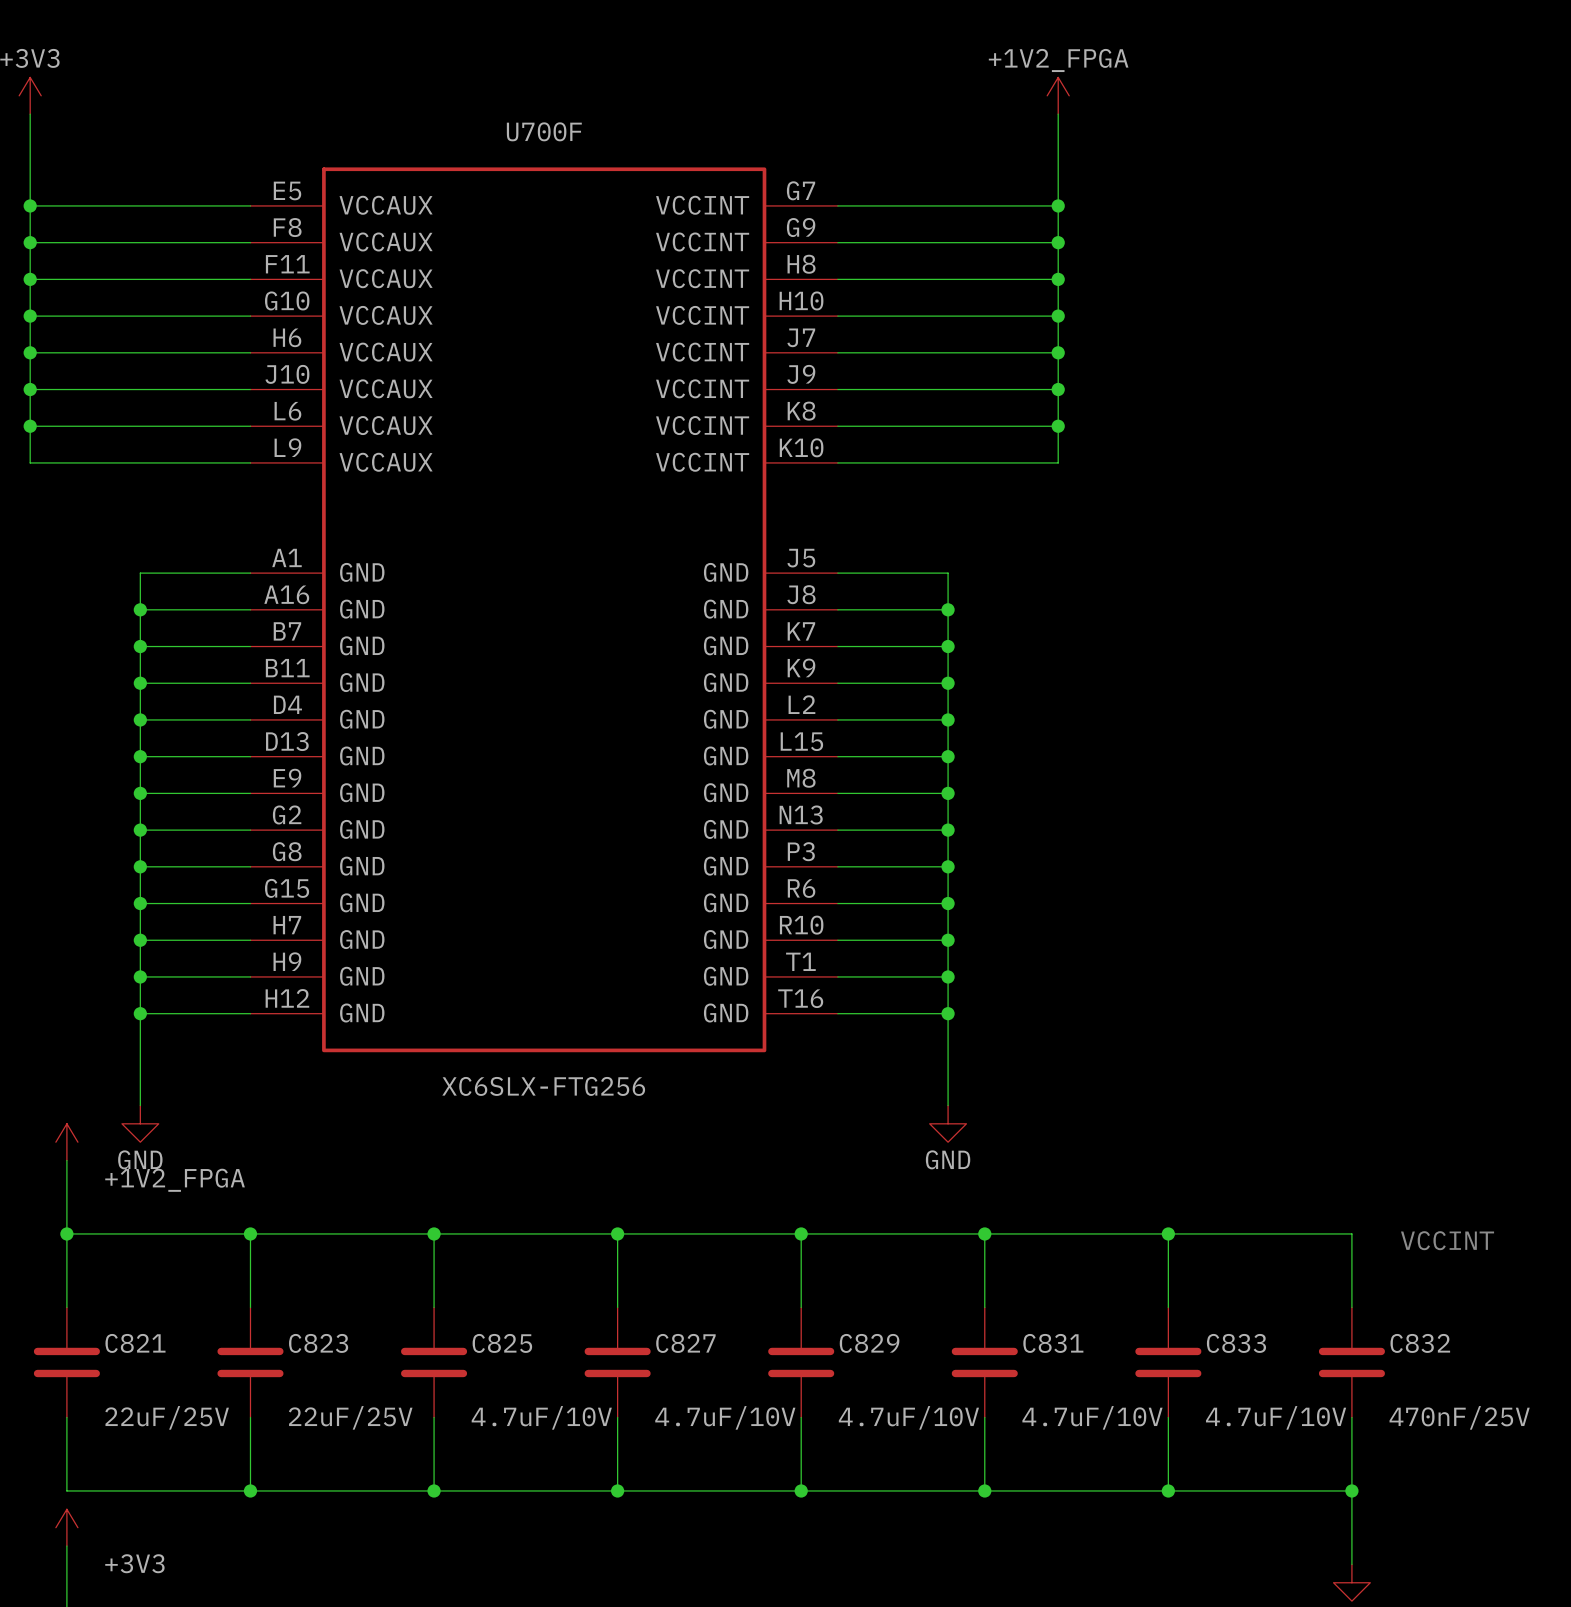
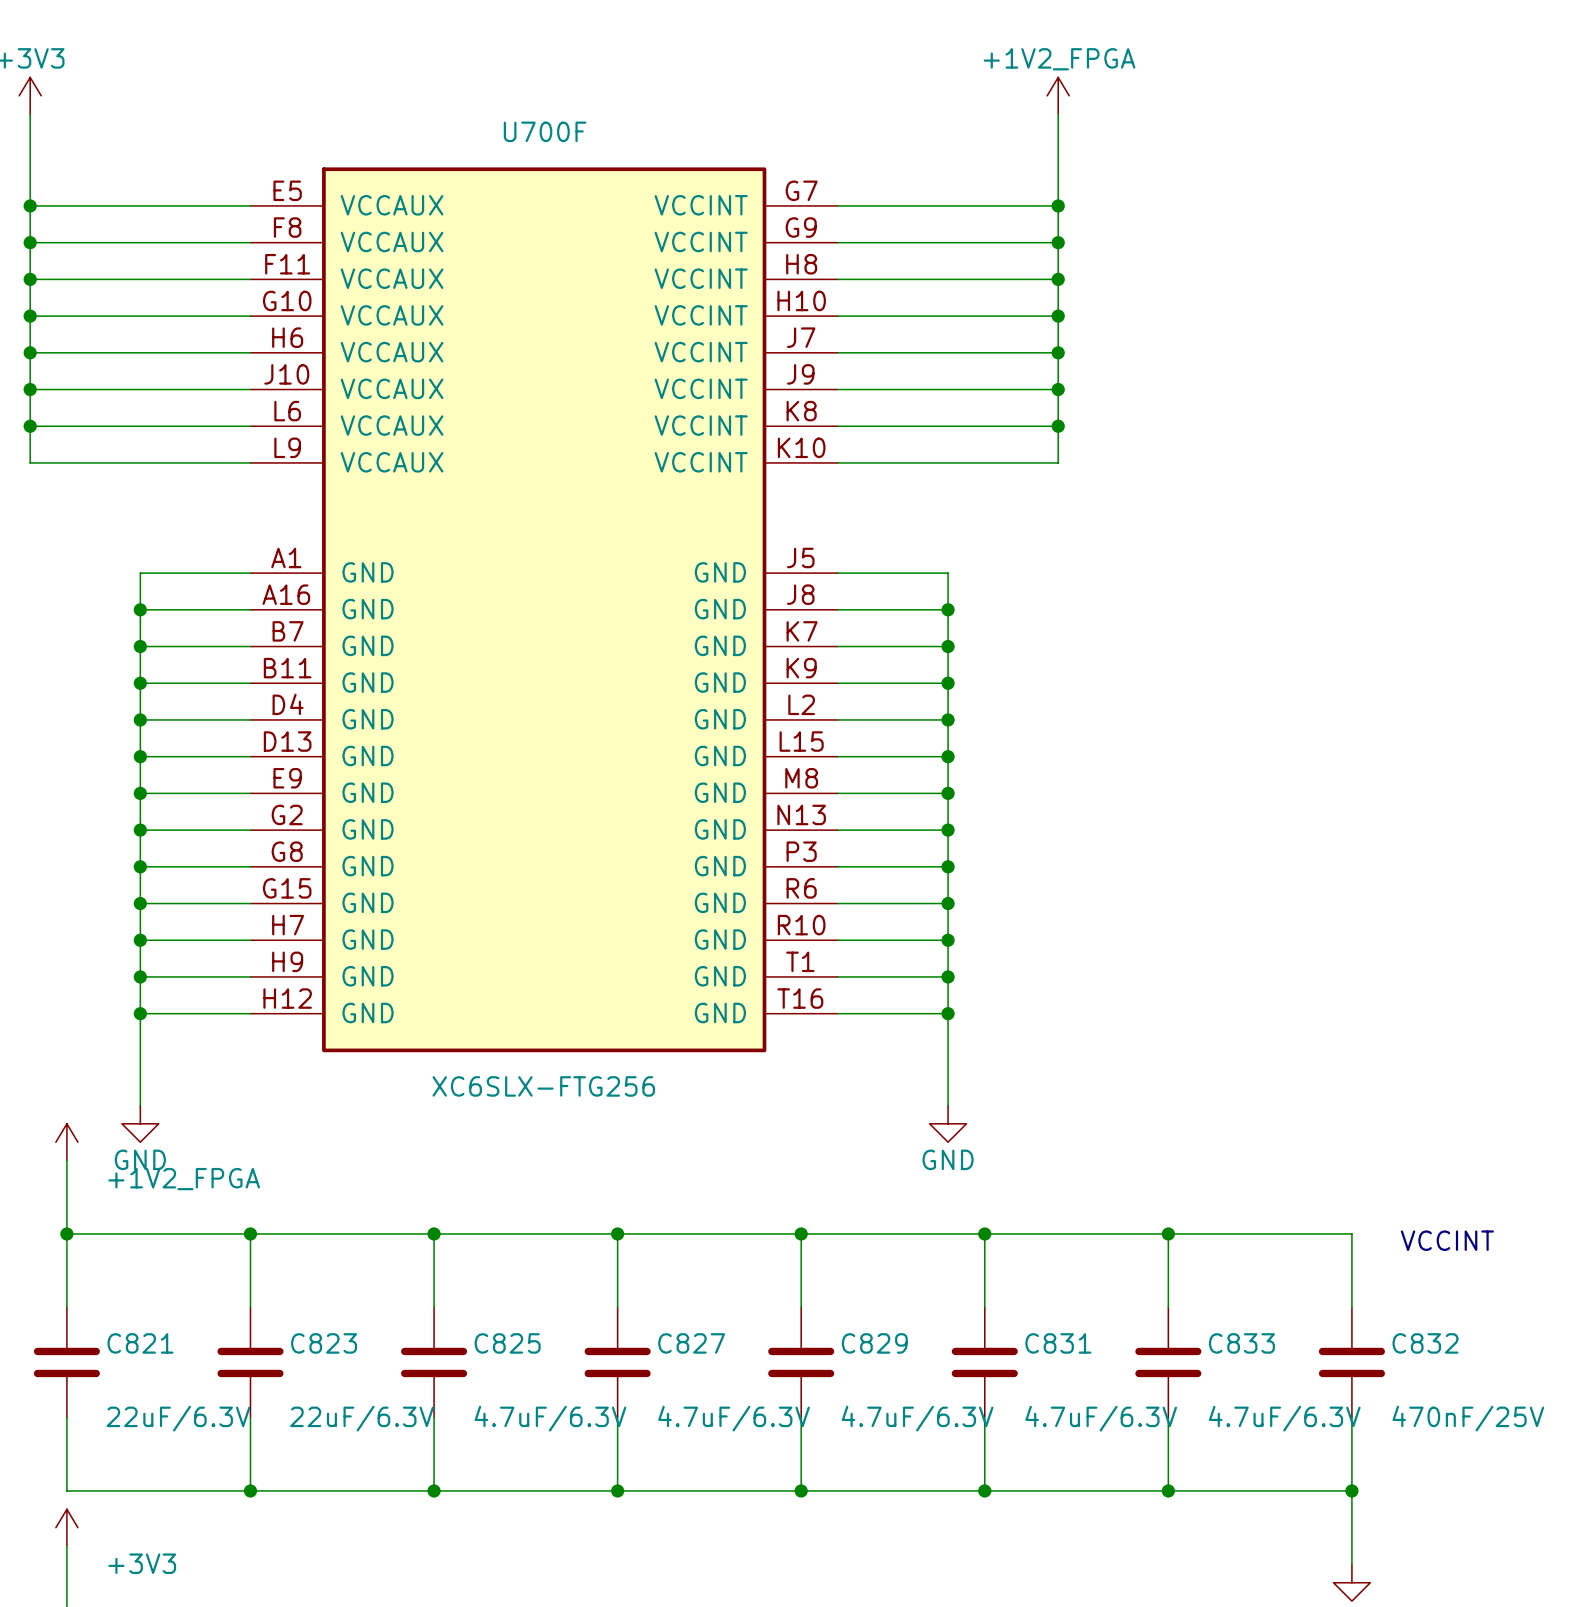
C821 value: 22uF/25V (167, 1417) -> 22uF/6.3V (178, 1418)
C823 value: 22uF/25V (350, 1417) -> 22uF/6.3V (362, 1418)
C825 value: 4.7uF/10V (541, 1417) -> 4.7uF/6.3V (550, 1418)
C827 value: 4.7uF/10V (725, 1417) -> 4.7uF/6.3V (734, 1418)
C829 value: 4.7uF/10V (908, 1417) -> 4.7uF/6.3V (917, 1418)
C831 value: 4.7uF/10V (1092, 1417) -> 4.7uF/6.3V (1101, 1418)
C833 value: 4.7uF/10V (1276, 1417) -> 4.7uF/6.3V (1284, 1418)

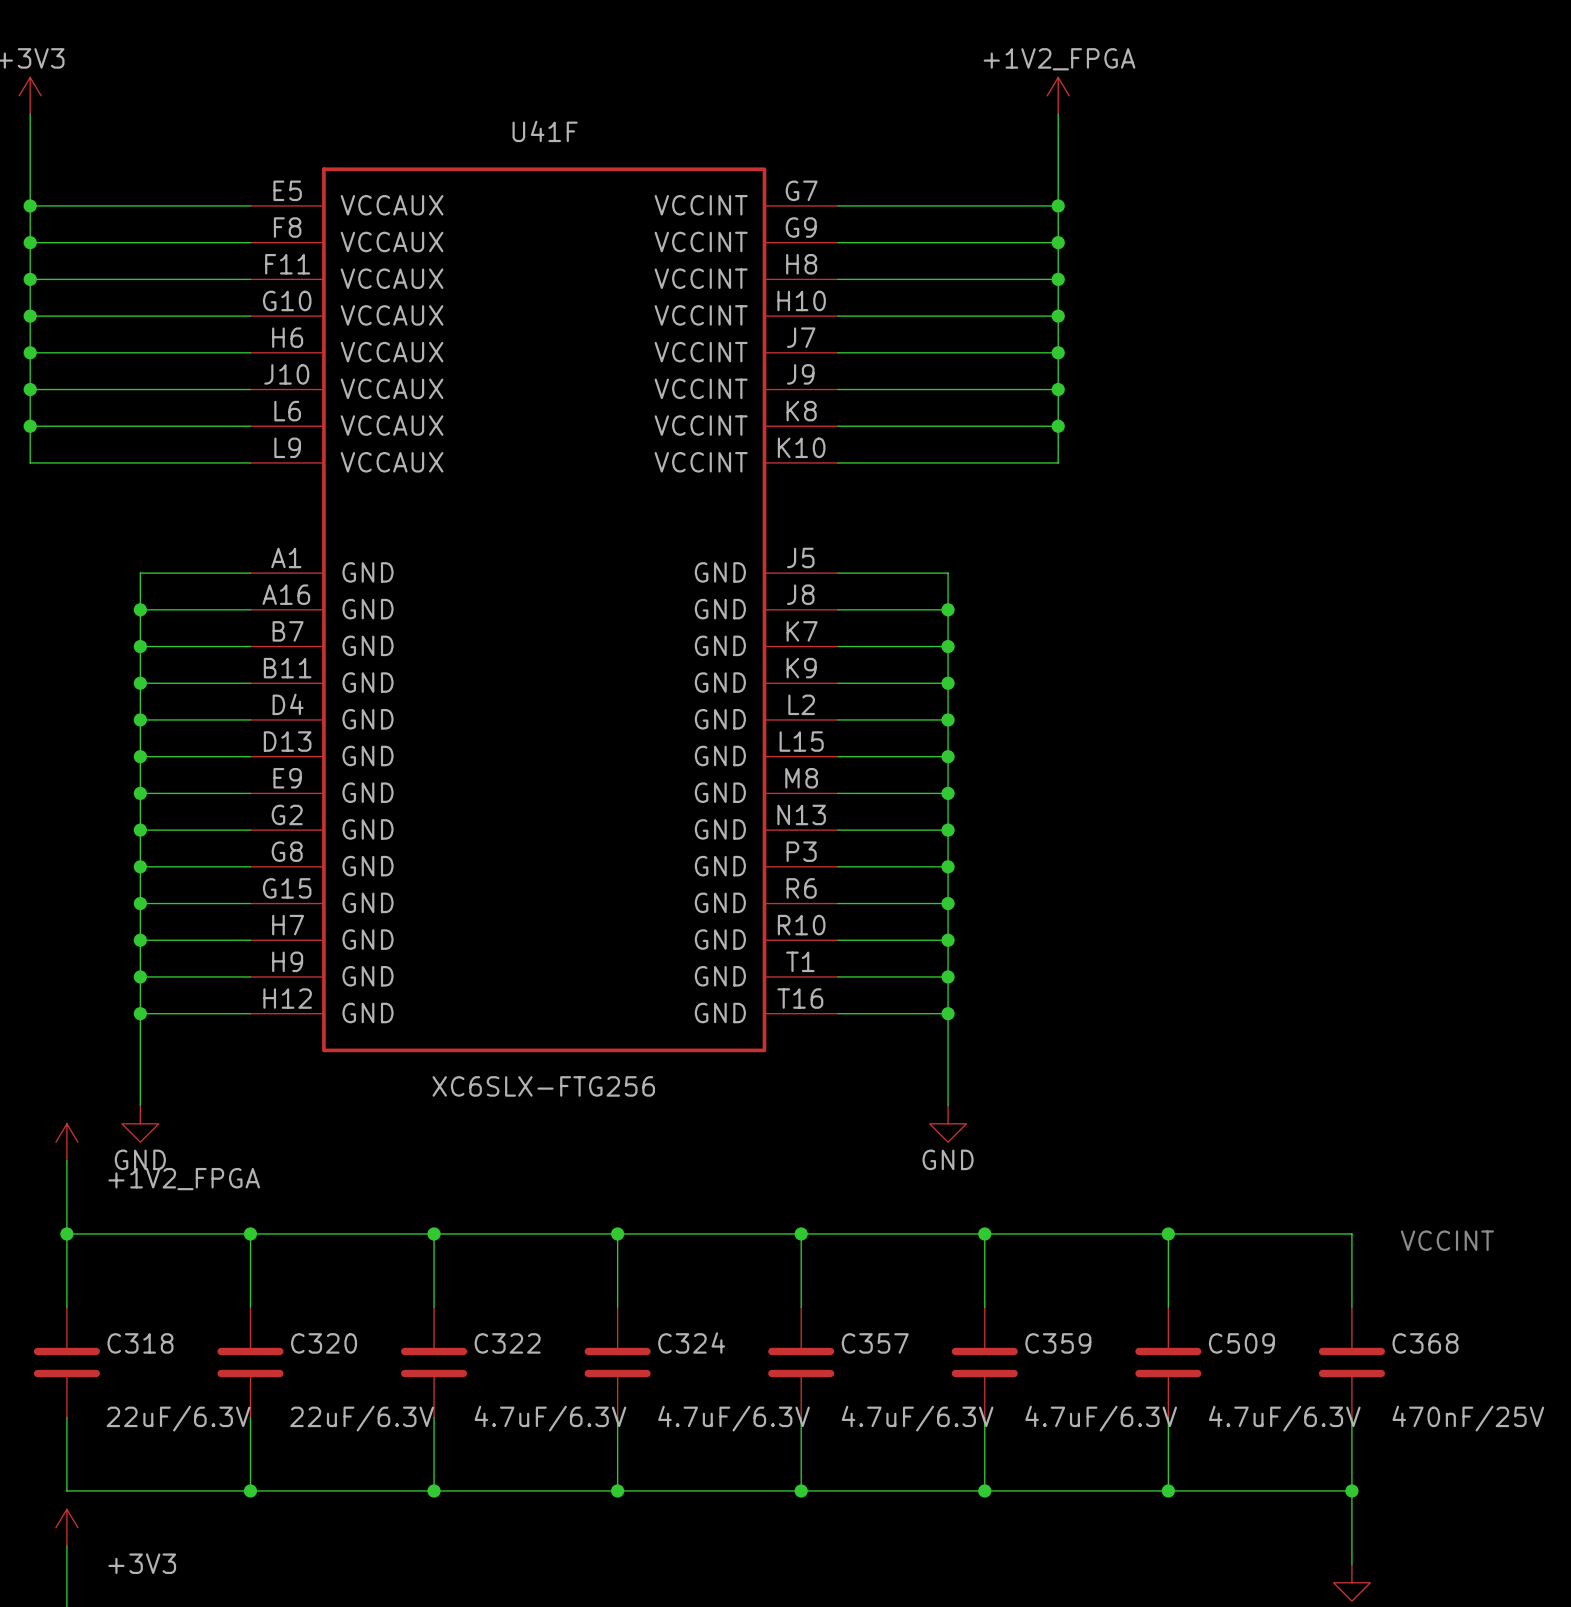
U700F name: U700F (545, 131) -> U41F (545, 131)
C821 name: C821 (140, 1343) -> C318 (140, 1343)
C823 name: C823 (324, 1343) -> C320 (324, 1343)
C825 name: C825 (507, 1343) -> C322 (507, 1343)
C827 name: C827 (691, 1343) -> C324 (691, 1342)
C829 name: C829 (874, 1343) -> C357 (875, 1343)
C831 name: C831 (1058, 1343) -> C359 (1058, 1343)
C833 name: C833 (1241, 1343) -> C509 (1241, 1343)
C832 name: C832 (1425, 1343) -> C368 (1425, 1343)

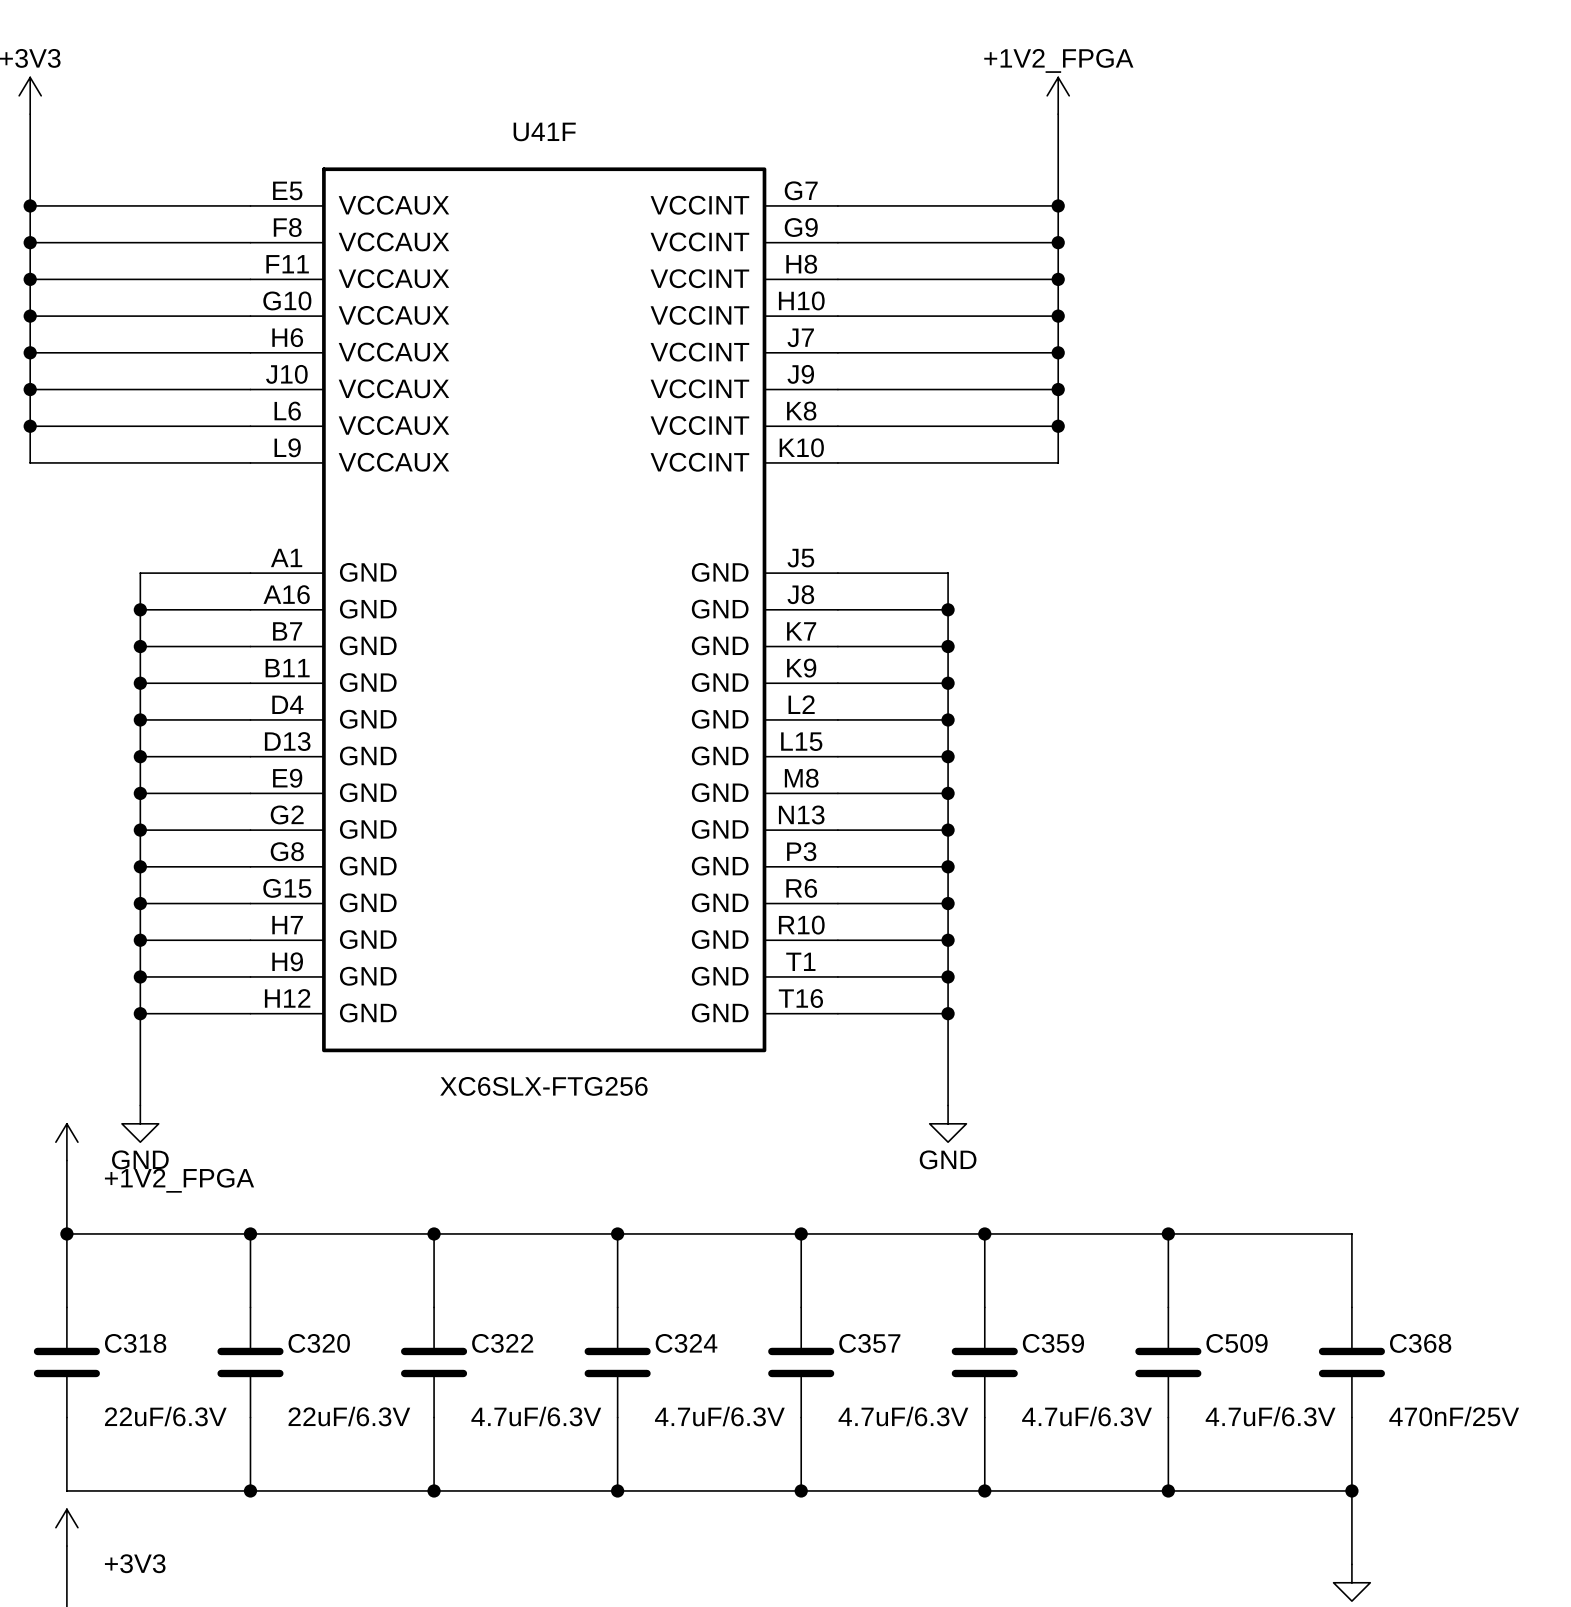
text: VCCINT (1447, 1240) -> none

